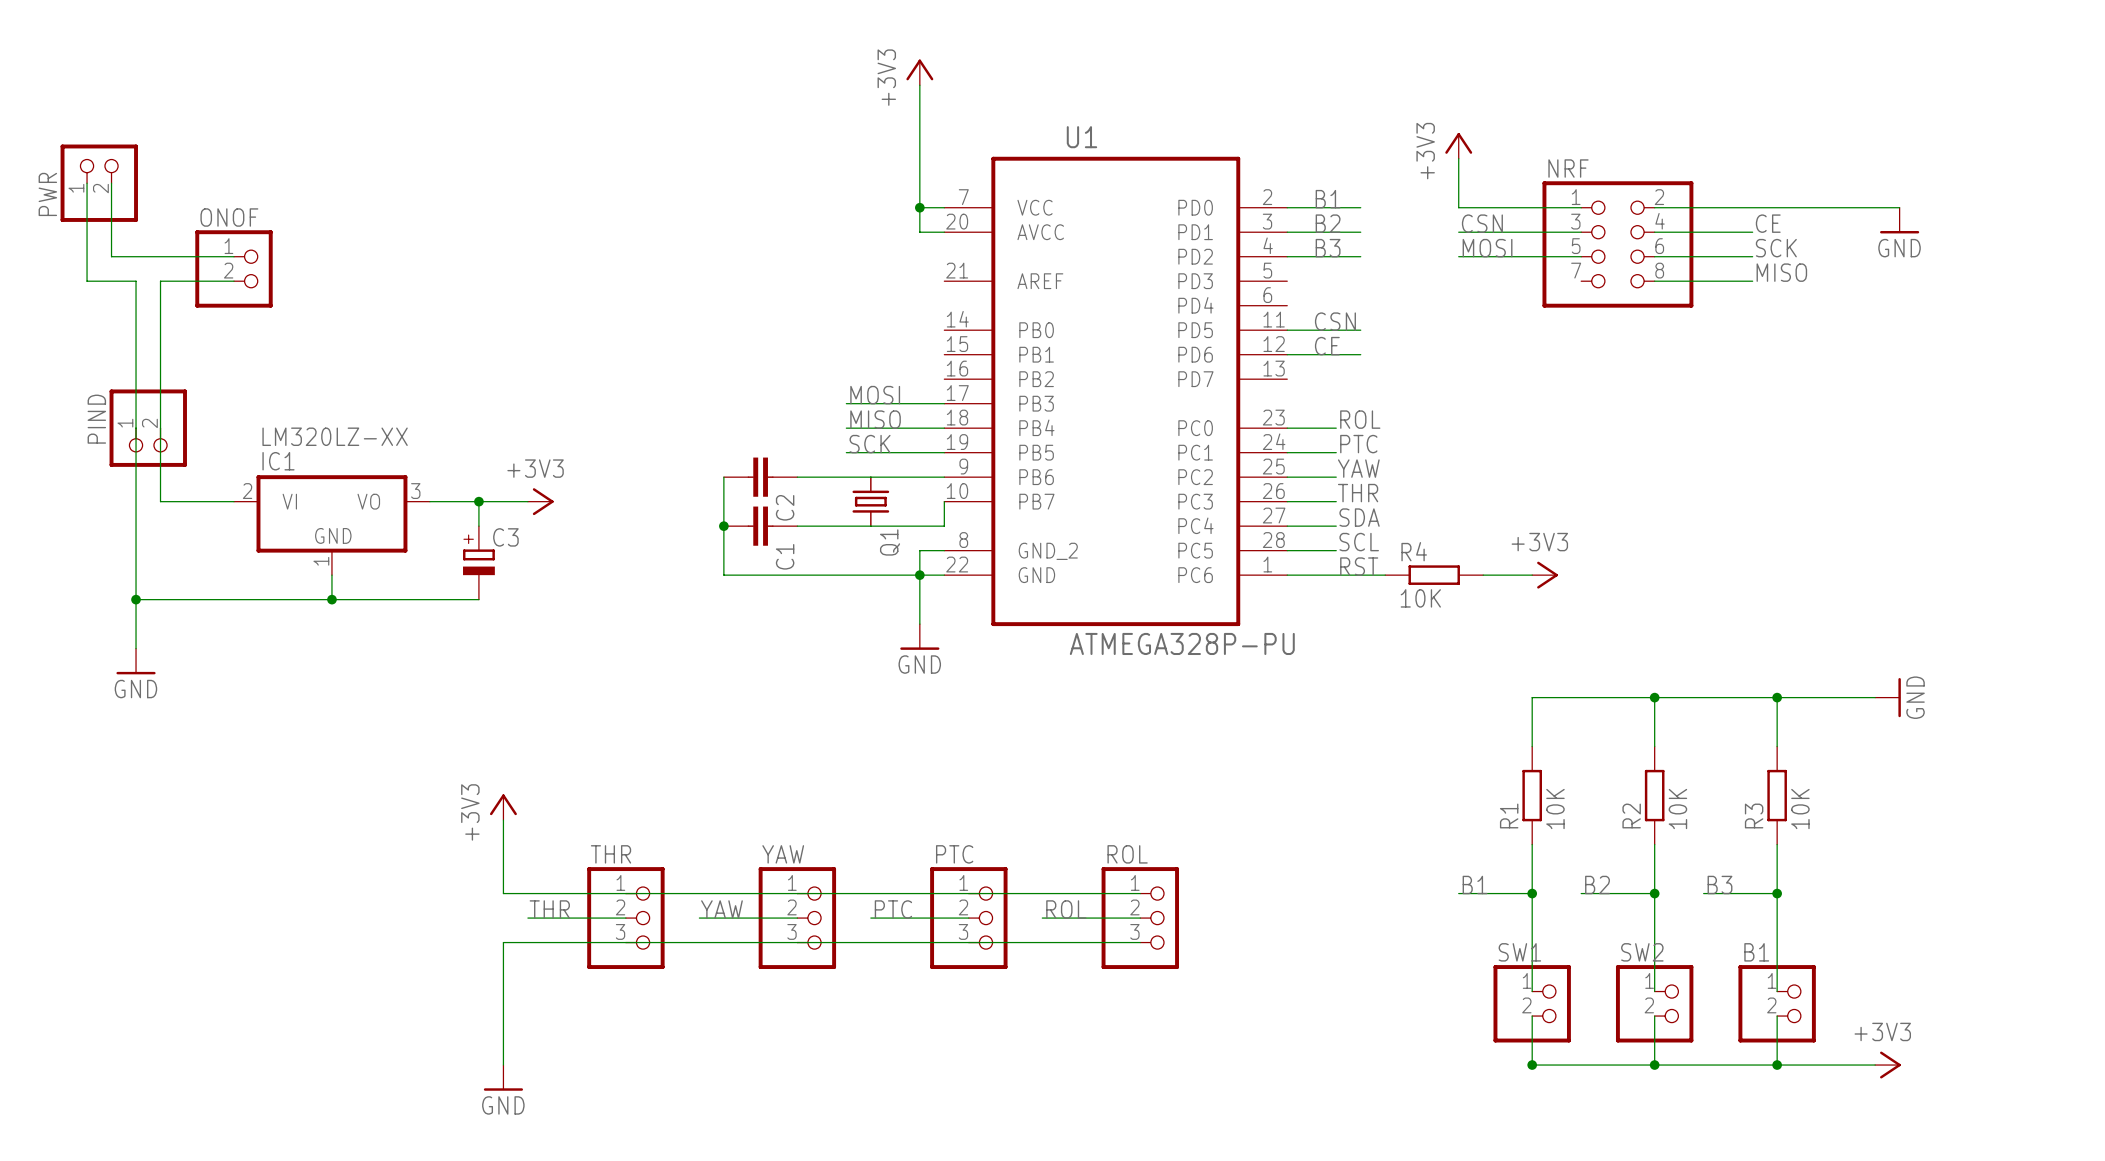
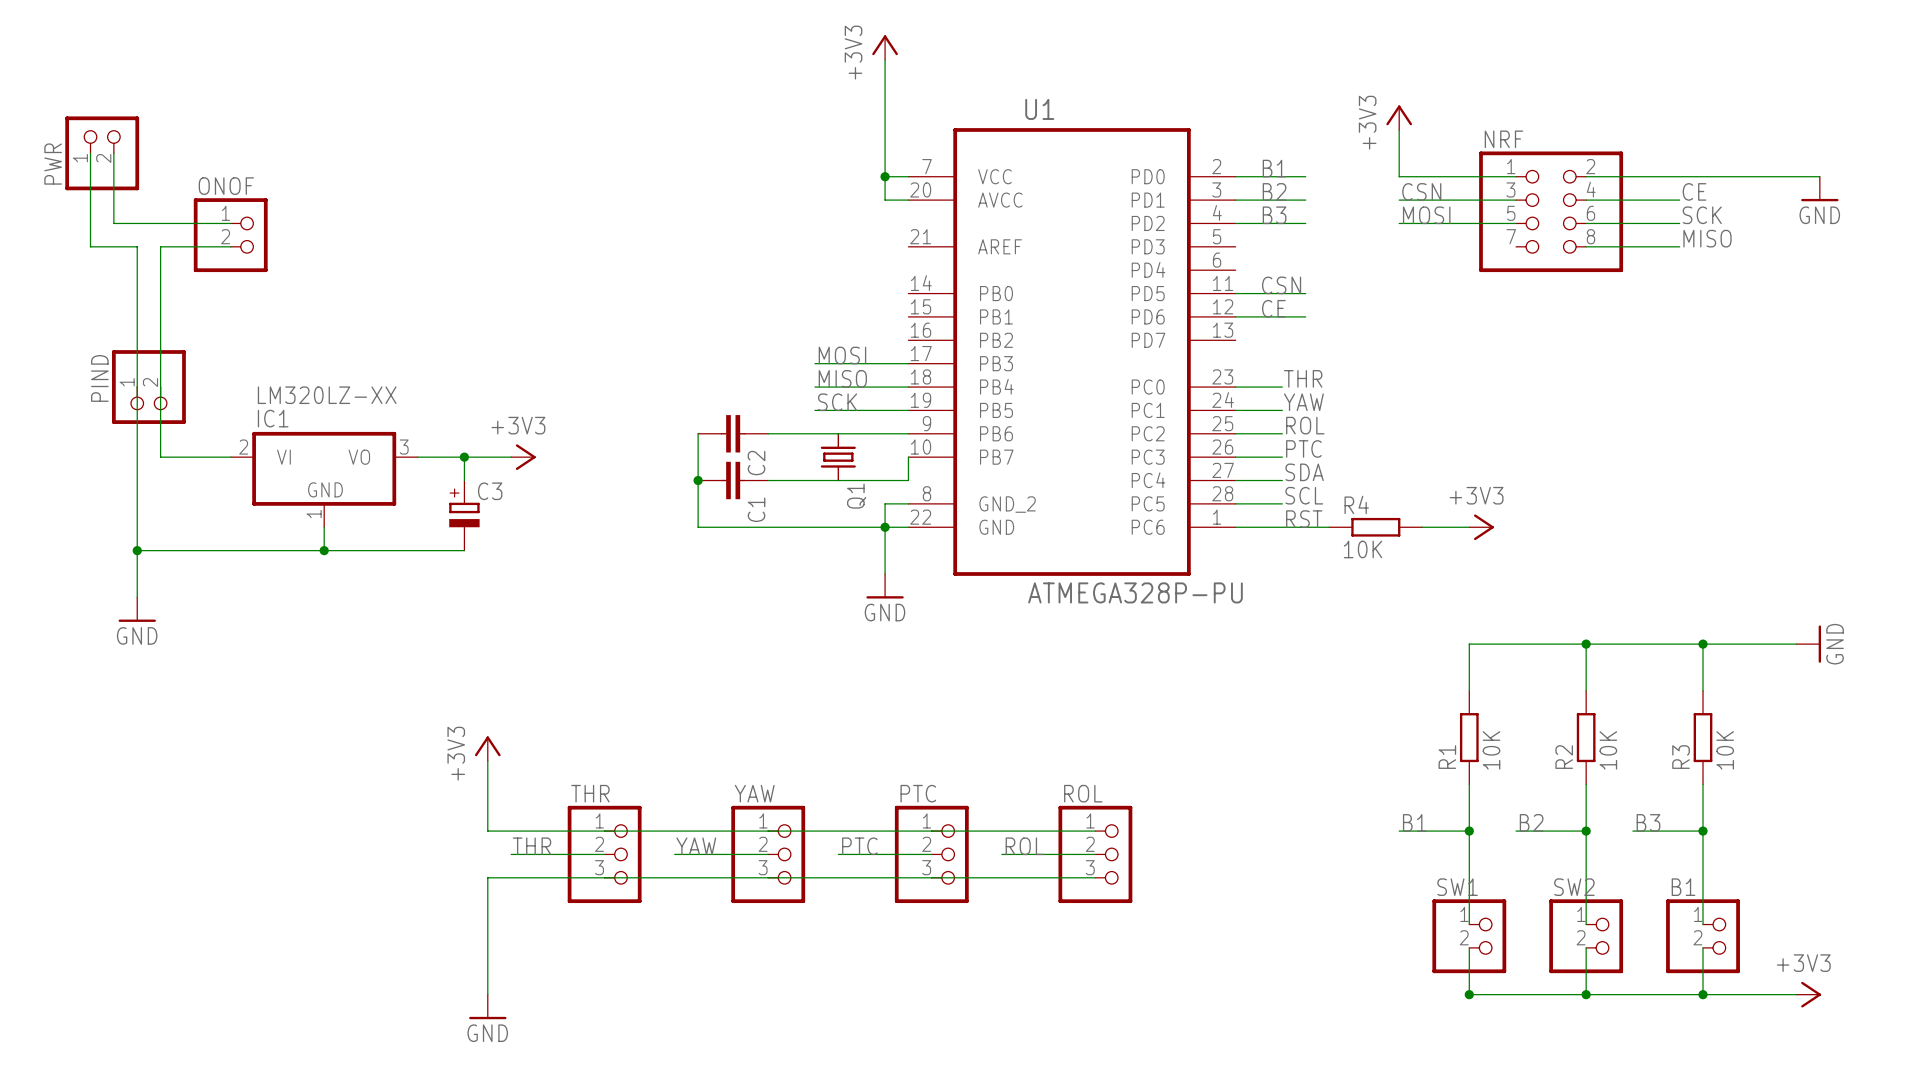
label: ROL (1360, 419) -> THR (1303, 378)
label: PTC (1358, 444) -> YAW (1303, 402)
label: YAW (1358, 468) -> ROL (1305, 425)
label: THR (1358, 493) -> PTC (1303, 448)

